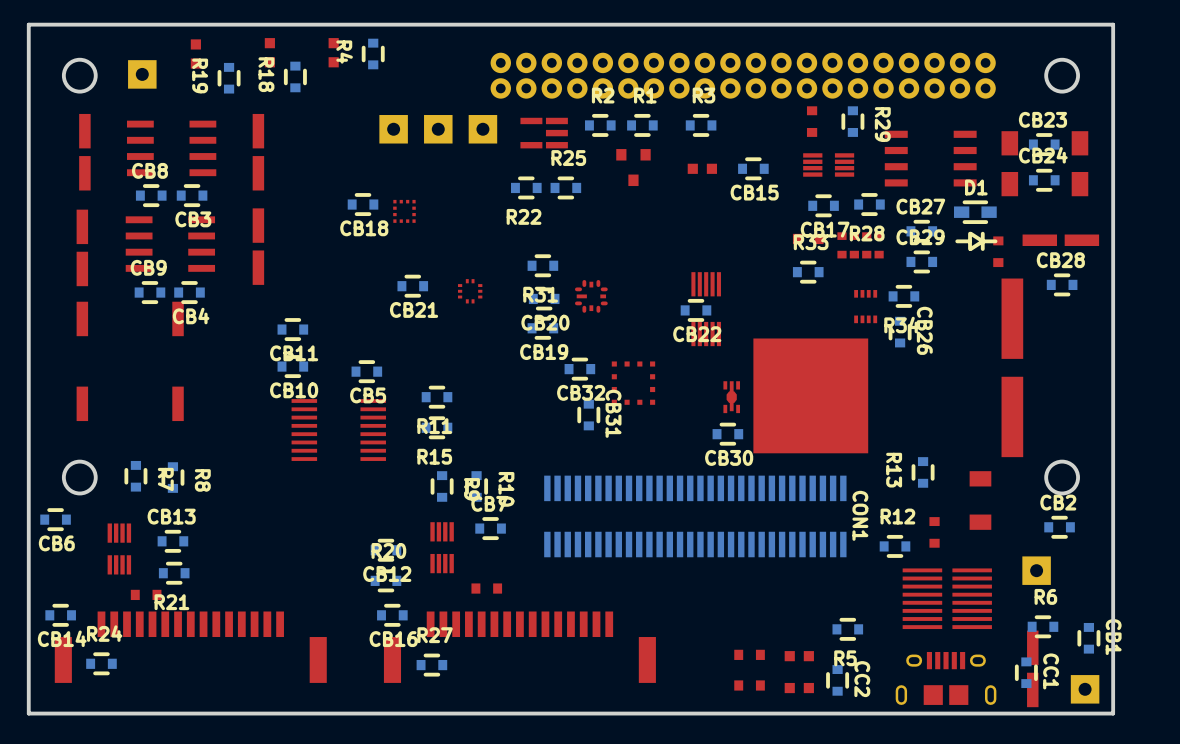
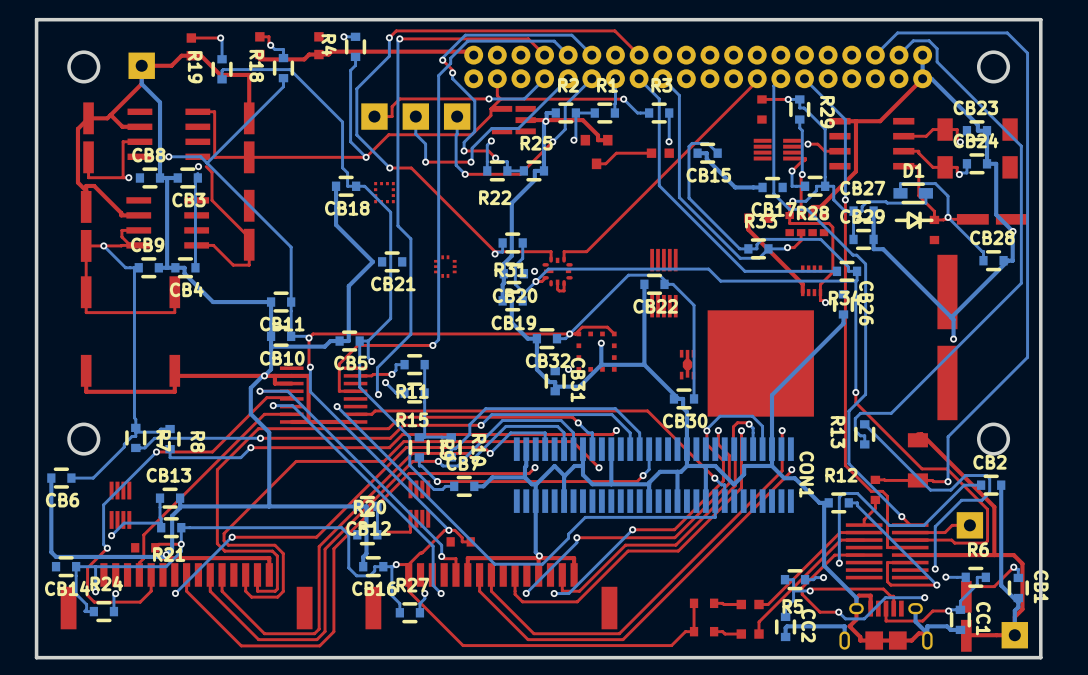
top track: none -> (259, 36) (269, 36) (270, 45)
via: none -> (343, 36)
top track: none -> (220, 38) (191, 38)
bottom track: none -> (220, 38) (222, 59)
via: none -> (220, 38)
top track: none -> (389, 37) (396, 30) (614, 30) (639, 55)
bottom track: none -> (389, 37) (389, 56) (356, 88) (356, 134) (389, 168)
via: none -> (389, 37)
top track: none -> (399, 38) (528, 38) (544, 55)
bottom track: none -> (399, 38) (397, 40) (397, 225) (410, 238) (410, 334) (377, 367) (378, 394)
via: none -> (399, 38)
bottom track: none -> (270, 45) (274, 49) (283, 49) (283, 58)
via: none -> (270, 45)
top track: none -> (473, 55) (470, 51) (331, 51) (328, 54) (309, 54) (304, 59) (259, 59)
bottom track: none -> (568, 55) (554, 41) (467, 41) (450, 58) (450, 63) (438, 75) (438, 339) (432, 345)
bottom track: none -> (591, 55) (571, 35) (465, 35) (442, 57) (442, 60)
bottom track: none -> (875, 55) (897, 32) (1007, 32) (1027, 53) (1027, 357) (948, 436) (948, 481)
bottom track: none -> (899, 55) (913, 40) (929, 40) (937, 48) (937, 61) (1021, 146) (1021, 283) (891, 413) (860, 413) (855, 418) (855, 430) (860, 435) (864, 435) (864, 444)
bottom track: none -> (922, 55) (922, 78) (931, 78) (977, 125) (977, 130) (987, 130) (987, 163) (996, 163) (996, 214) (1012, 231) (1012, 260) (1003, 260)
bottom track: none -> (355, 56) (355, 65) (350, 70) (350, 141) (366, 157)
top track: none -> (442, 60) (452, 70) (452, 72)
via: none -> (442, 60)
bottom track: none -> (141, 65) (141, 83) (160, 102) (160, 178) (177, 178)
bottom track: none -> (452, 72) (452, 78) (474, 100) (474, 131) (464, 142) (464, 150)
via: none -> (452, 72)
bottom track: none -> (283, 78) (283, 86) (207, 163)
top track: none -> (497, 78) (497, 95) (500, 99)
bottom track: none -> (544, 78) (524, 98) (489, 98)
bottom track: none -> (568, 78) (518, 128) (491, 128) (472, 148) (471, 162)
bottom track: none -> (591, 78) (565, 105) (565, 129) (552, 141)
bottom track: none -> (615, 78) (614, 113)
bottom track: none -> (639, 78) (659, 98) (659, 185) (744, 271) (836, 271)
bottom track: none -> (662, 78) (679, 95) (679, 197) (740, 258) (759, 258) (768, 248) (787, 247)
top track: none -> (757, 78) (757, 81) (586, 251) (564, 251) (564, 259)
bottom track: none -> (780, 78) (773, 85) (773, 193) (789, 209) (807, 209) (853, 255) (856, 255) (865, 264) (865, 394) (848, 411) (848, 463) (901, 516)
bottom track: none -> (804, 78) (845, 119) (845, 199)
top track: none -> (922, 78) (880, 121) (839, 121)
bottom track: none -> (222, 79) (223, 69) (290, 69) (342, 122) (342, 167) (347, 172) (347, 186) (364, 186) (390, 212) (390, 318) (368, 341)
top track: none -> (489, 98) (399, 98) (392, 106) (392, 116) (374, 116)
via: none -> (489, 98)
top track: none -> (500, 99) (490, 108)
top track: none -> (623, 99) (500, 99)
bottom track: none -> (623, 99) (637, 113) (649, 113)
via: none -> (623, 99)
top track: none -> (788, 99) (761, 99)
bottom track: none -> (788, 99) (799, 99) (799, 108) (804, 108) (825, 129) (825, 186)
via: none -> (788, 99)
top track: none -> (490, 108) (490, 115) (471, 134) (388, 134) (366, 157) (215, 157) (214, 111) (197, 111)
bottom track: none -> (555, 113) (546, 113) (546, 120) (543, 123) (543, 170) (534, 170) (534, 180) (511, 203) (511, 255) (503, 263) (502, 284) (502, 300) (511, 300) (511, 322) (527, 338) (536, 338) (536, 369) (549, 382) (555, 382) (555, 391)
bottom track: none -> (594, 113) (575, 113) (575, 138) (573, 140)
bottom track: none -> (669, 113) (669, 141)
top track: none -> (110, 114) (122, 126) (139, 126)
bottom track: none -> (415, 116) (415, 134) (425, 144) (425, 162)
bottom track: none -> (457, 116) (456, 165) (465, 174)
top track: none -> (249, 118) (249, 74) (220, 74) (201, 55) (181, 55) (171, 65) (141, 65) (141, 83) (107, 118) (88, 118) (77, 128) (77, 182) (86, 190)
bottom track: none -> (799, 119) (799, 128) (802, 130) (802, 174)
top track: none -> (525, 120) (582, 120) (598, 135) (598, 140) (607, 140)
via: none -> (545, 121)
top track: none -> (855, 121) (855, 171) (820, 206) (812, 206) (812, 215)
top track: none -> (903, 136) (926, 136) (932, 129) (957, 129) (957, 138) (960, 142)
via: none -> (573, 140)
bottom track: none -> (491, 141) (487, 145) (487, 170)
via: none -> (491, 141)
top track: none -> (139, 141) (123, 141) (123, 177)
top track: none -> (552, 141) (520, 174) (465, 174)
via: none -> (552, 141)
via: none -> (669, 141)
via: none -> (960, 142)
top track: none -> (807, 144) (817, 144) (824, 151) (839, 151)
via: none -> (807, 144)
top track: none -> (464, 150) (488, 150) (495, 158)
via: none -> (464, 150)
top track: none -> (903, 151) (918, 151) (932, 167) (957, 167) (959, 174)
top track: none -> (651, 153) (616, 153) (605, 163) (596, 163)
bottom track: none -> (697, 153) (706, 153) (706, 158) (735, 187) (762, 187)
bottom track: none -> (717, 153) (707, 143) (692, 143) (688, 146) (688, 198) (739, 248) (756, 248) (756, 244) (762, 239) (820, 239) (848, 267) (848, 271) (857, 271) (857, 280) (720, 281) (708, 269) (548, 269) (522, 294)
bottom track: none -> (168, 156) (200, 156) (291, 247) (291, 336) (307, 336) (309, 338)
via: none -> (168, 156)
top track: none -> (88, 157) (88, 177) (128, 177)
via: none -> (366, 157)
bottom track: none -> (495, 158) (499, 161) (507, 161) (507, 170) (523, 170)
via: none -> (495, 158)
top track: none -> (792, 158) (805, 158) (792, 171)
via: none -> (425, 162)
top track: none -> (471, 162) (425, 162)
via: none -> (471, 162)
bottom track: none -> (966, 163) (966, 172) (959, 174)
top track: none -> (903, 166) (918, 166) (918, 195) (934, 211) (934, 219) (972, 219)
via: none -> (198, 166)
top track: none -> (206, 166) (212, 172) (212, 200) (249, 237) (249, 265) (233, 265) (213, 245) (196, 245)
top track: none -> (389, 168) (411, 168) (495, 251)
via: none -> (389, 168)
bottom track: none -> (792, 171) (792, 186) (805, 186)
via: none -> (792, 171)
bottom track: none -> (197, 173) (195, 175) (195, 267)
via: none -> (465, 174)
top track: none -> (802, 174) (801, 215)
via: none -> (802, 174)
via: none -> (959, 174)
via: none -> (128, 177)
bottom track: none -> (167, 178) (167, 267)
bottom track: none -> (336, 186) (336, 224) (372, 261) (348, 286) (348, 341) (330, 341) (324, 346) (271, 346)
bottom track: none -> (900, 193) (900, 183) (935, 183) (948, 196) (948, 217) (983, 251) (983, 260)
bottom track: none -> (925, 193) (925, 203) (867, 201) (862, 206) (862, 211) (844, 211) (833, 199) (833, 186) (816, 186) (816, 190) (805, 201) (792, 201)
top track: none -> (845, 199) (845, 465) (871, 491) (882, 491) (887, 496) (887, 547) (910, 547)
via: none -> (845, 199)
top track: none -> (792, 201) (789, 204) (789, 223) (829, 223) (832, 227) (832, 272) (820, 284) (820, 300) (825, 302)
via: none -> (792, 201)
top track: none -> (86, 206) (86, 185) (94, 185) (121, 213) (121, 215) (138, 215)
bottom track: none -> (857, 211) (853, 215) (853, 239)
bottom track: none -> (873, 211) (873, 249) (883, 249) (953, 319) (953, 339)
top track: none -> (748, 218) (748, 229) (802, 284) (802, 292)
via: none -> (948, 217)
top track: none -> (138, 230) (121, 230) (121, 236) (130, 245)
via: none -> (1012, 231)
top track: none -> (801, 232) (801, 240) (794, 247) (787, 247)
bottom track: none -> (502, 242) (502, 252) (495, 253)
bottom track: none -> (522, 242) (522, 258) (515, 265) (515, 284) (522, 291) (522, 300)
bottom track: none -> (103, 245) (125, 267) (138, 267)
via: none -> (103, 245)
top track: none -> (138, 245) (86, 245) (86, 312) (174, 312) (174, 292)
via: none -> (787, 247)
top track: none -> (495, 251) (551, 251) (551, 259)
via: none -> (495, 253)
bottom track: none -> (1008, 260) (951, 317)
bottom track: none -> (134, 267) (135, 436) (132, 436) (124, 444) (124, 447) (93, 478) (71, 478)
bottom track: none -> (158, 267) (184, 267) (184, 273) (213, 302) (271, 302) (271, 369) (250, 387) (250, 414) (269, 432) (269, 506)
via: none -> (534, 271)
top track: none -> (545, 277) (541, 281) (535, 281)
bottom track: none -> (855, 281) (855, 392)
via: none -> (535, 281)
top track: none -> (557, 282) (559, 290) (564, 290) (564, 283)
bottom track: none -> (644, 284) (644, 364)
bottom track: none -> (664, 284) (673, 284) (694, 305) (694, 398)
bottom track: none -> (668, 284) (659, 275) (628, 275) (565, 338) (556, 338)
via: none -> (825, 302)
bottom track: none -> (843, 314) (843, 323) (772, 395) (772, 465)
via: none -> (569, 333)
top track: none -> (578, 333) (313, 333) (309, 338) (310, 367)
top track: none -> (614, 333) (607, 327) (582, 327) (575, 333)
via: none -> (309, 338)
via: none -> (953, 339)
bottom track: none -> (368, 341) (359, 341) (359, 387) (409, 437) (409, 465) (434, 489) (454, 486)
bottom track: none -> (368, 341) (368, 357) (371, 361)
bottom track: none -> (601, 343) (601, 364)
via: none -> (601, 343)
top track: none -> (432, 345) (357, 345) (339, 364) (339, 391) (355, 391)
via: none -> (432, 345)
via: none -> (371, 361)
bottom track: none -> (404, 364) (396, 364) (396, 370) (391, 374)
bottom track: none -> (424, 364) (424, 437) (451, 437)
bottom track: none -> (601, 364) (579, 386) (555, 386)
bottom track: none -> (644, 364) (601, 364)
bottom track: none -> (644, 364) (678, 398)
bottom track: none -> (310, 367) (310, 391) (448, 530)
via: none -> (310, 367)
via: none -> (568, 369)
top track: none -> (174, 370) (174, 391) (86, 391) (86, 370)
top track: none -> (391, 374) (355, 375)
via: none -> (391, 374)
top track: none -> (174, 375) (308, 375) (308, 421)
via: none -> (264, 375)
top track: none -> (274, 375) (274, 383) (291, 383)
bottom track: none -> (385, 382) (395, 393) (404, 393)
via: none -> (385, 382)
bottom track: none -> (260, 391) (287, 391) (441, 545) (441, 556)
via: none -> (260, 391)
top track: none -> (855, 392) (855, 402) (922, 468) (947, 468) (987, 509) (987, 541) (985, 543) (954, 543) (951, 540) (910, 540)
via: none -> (855, 392)
via: none -> (378, 394)
top track: none -> (291, 398) (266, 397) (212, 451) (156, 451)
bottom track: none -> (673, 398) (683, 398) (683, 408) (686, 411) (686, 465)
bottom track: none -> (273, 405) (292, 405) (433, 546) (433, 585) (441, 593)
via: none -> (273, 405)
bottom track: none -> (337, 406) (494, 564) (542, 564) (568, 538) (568, 534) (585, 517) (715, 517) (715, 501)
via: none -> (337, 406)
top track: none -> (291, 414) (264, 414) (143, 534) (143, 558) (139, 562) (139, 574)
top track: none -> (355, 414) (371, 414) (375, 410) (647, 410) (714, 478)
top track: none -> (355, 421) (291, 421)
top track: none -> (578, 422) (572, 417) (400, 417) (388, 428) (258, 428) (217, 469) (217, 543) (224, 551) (272, 551) (277, 556) (277, 589) (275, 591) (257, 591) (257, 574)
bottom track: none -> (578, 422) (588, 432) (592, 432) (592, 449)
via: none -> (578, 422)
top track: none -> (749, 424) (737, 422) (733, 426) (735, 485) (675, 545) (625, 545) (579, 591) (562, 591) (562, 574)
bottom track: none -> (749, 424) (753, 428) (753, 449)
via: none -> (749, 424)
bottom track: none -> (864, 424) (930, 490) (950, 490) (965, 475) (986, 475) (989, 478) (989, 492) (982, 500) (961, 500) (935, 526) (935, 569)
top track: none -> (481, 425) (403, 425) (390, 438) (260, 438)
bottom track: none -> (481, 425) (491, 414) (611, 414) (630, 432) (630, 449)
via: none -> (481, 425)
bottom track: none -> (170, 429) (160, 429) (157, 432) (135, 432)
top track: none -> (616, 430) (612, 434) (402, 434) (389, 447) (250, 447)
via: none -> (616, 430)
top track: none -> (706, 430) (706, 444) (723, 460) (723, 480) (674, 529) (632, 529)
bottom track: none -> (706, 430) (720, 416) (752, 416) (762, 426) (762, 449)
via: none -> (706, 430)
top track: none -> (718, 430) (718, 444) (729, 455) (729, 483) (674, 537) (576, 537)
via: none -> (718, 430)
top track: none -> (741, 430) (741, 487) (678, 551) (628, 551) (577, 601) (522, 601) (515, 594) (515, 574)
via: none -> (741, 430)
top track: none -> (782, 430) (782, 470) (619, 633) (533, 633) (491, 591) (491, 574)
via: none -> (782, 430)
top track: none -> (917, 434) (921, 434) (994, 506) (994, 555)
bottom track: none -> (260, 438) (154, 438) (144, 447) (135, 447)
via: none -> (260, 438)
bottom track: none -> (250, 447) (240, 457) (170, 457) (170, 449)
via: none -> (250, 447)
bottom track: none -> (526, 449) (524, 477)
bottom track: none -> (545, 449) (545, 432) (510, 432) (490, 453)
bottom track: none -> (564, 449) (564, 432) (557, 426) (505, 426) (474, 457) (474, 460)
bottom track: none -> (573, 449) (573, 432) (561, 420) (502, 420) (458, 465) (442, 465) (438, 461)
bottom track: none -> (582, 449) (582, 474) (592, 484) (649, 484)
bottom track: none -> (611, 449) (611, 484)
bottom track: none -> (639, 449) (639, 432) (615, 408) (485, 408) (469, 424) (469, 434) (455, 448) (451, 448) (451, 457)
bottom track: none -> (649, 449) (649, 469) (643, 475)
bottom track: none -> (156, 451) (103, 504) (103, 544) (107, 548)
via: none -> (156, 451)
top track: none -> (490, 453) (484, 447) (406, 447) (316, 537) (232, 537)
via: none -> (490, 453)
bottom track: none -> (419, 457) (419, 465) (421, 465) (437, 481)
top track: none -> (474, 460) (467, 453) (412, 453) (319, 546) (319, 629) (314, 633) (264, 633) (222, 591) (222, 574)
top track: none -> (438, 461) (412, 461) (325, 549) (325, 631) (316, 639) (258, 639) (210, 591) (210, 574)
via: none -> (438, 461)
bottom track: none -> (582, 465) (574, 465) (564, 476) (564, 501)
bottom track: none -> (686, 465) (681, 471) (660, 471) (649, 482) (649, 501)
bottom track: none -> (705, 465) (705, 501)
bottom track: none -> (772, 465) (744, 465) (744, 474) (734, 484) (715, 465) (686, 465)
bottom track: none -> (772, 465) (784, 478) (794, 478) (819, 502) (828, 502)
top track: none -> (535, 467) (529, 473) (409, 473) (333, 548) (333, 631) (319, 645) (241, 645) (186, 591) (186, 574)
via: none -> (535, 467)
top track: none -> (599, 467) (572, 441) (403, 441) (384, 461) (296, 461) (224, 533) (224, 540) (228, 545) (274, 545) (283, 553) (283, 591) (277, 597) (251, 597) (245, 591) (245, 574)
via: none -> (599, 467)
top track: none -> (791, 469) (622, 639) (528, 639) (479, 591) (479, 574)
via: none -> (791, 469)
bottom track: none -> (677, 471) (677, 501)
top track: none -> (643, 475) (637, 481) (437, 481)
via: none -> (643, 475)
bottom track: none -> (564, 475) (554, 465) (536, 484) (531, 484) (524, 477)
bottom track: none -> (524, 477) (492, 477) (483, 486) (474, 486)
bottom track: none -> (51, 478) (51, 552) (56, 556) (164, 556) (172, 548) (172, 515) (180, 507) (180, 498)
bottom track: none -> (714, 478) (721, 484) (724, 484) (724, 501)
via: none -> (714, 478)
top track: none -> (875, 479) (948, 481)
via: none -> (437, 481)
via: none -> (948, 481)
bottom track: none -> (535, 484) (535, 552) (539, 555)
bottom track: none -> (981, 485) (964, 485) (923, 525) (889, 525) (857, 493) (843, 493) (839, 497) (839, 563)
bottom track: none -> (1001, 485) (1001, 585) (1018, 602)
bottom track: none -> (160, 498) (161, 527)
top track: none -> (875, 499) (875, 508) (864, 519) (864, 525)
bottom track: none -> (824, 502) (824, 565) (856, 598) (856, 608)
bottom track: none -> (848, 502) (857, 502) (857, 505) (936, 585)
bottom track: none -> (180, 506) (366, 506) (366, 553) (363, 556) (363, 566)
bottom track: none -> (377, 506) (377, 534)
top track: none -> (901, 516) (910, 525)
via: none -> (901, 516)
top track: none -> (410, 518) (410, 532) (388, 532)
bottom track: none -> (161, 523) (124, 523) (111, 535)
top track: none -> (969, 525) (952, 525) (945, 532) (910, 532)
bottom track: none -> (632, 529) (568, 593) (554, 593)
via: none -> (632, 529)
via: none -> (448, 530)
top track: none -> (864, 532) (840, 532) (768, 604) (759, 604)
via: none -> (111, 535)
bottom track: none -> (232, 537) (175, 593)
via: none -> (232, 537)
bottom track: none -> (576, 537) (576, 542) (526, 593)
via: none -> (576, 537)
top track: none -> (864, 540) (840, 540) (759, 622) (759, 634)
top track: none -> (470, 541) (462, 541) (462, 537) (454, 530) (444, 530) (407, 565)
top track: none -> (181, 544) (158, 544) (155, 547)
via: none -> (181, 544)
top track: none -> (107, 548) (87, 567) (87, 595) (94, 602) (140, 602) (151, 591) (151, 574)
via: none -> (107, 548)
top track: none -> (166, 554) (162, 558) (269, 558) (269, 574)
via: none -> (166, 554)
top track: none -> (864, 555) (834, 555) (802, 587) (802, 594) (820, 612) (838, 612)
top track: none -> (910, 555) (1013, 555) (1022, 563) (1022, 609) (1014, 616) (1014, 635) (966, 635)
via: none -> (539, 555)
top track: none -> (441, 556) (443, 558) (455, 558) (455, 574)
via: none -> (441, 556)
top track: none -> (538, 558) (467, 558) (467, 574)
top track: none -> (910, 562) (887, 562) (887, 581) (890, 585) (936, 585)
via: none -> (839, 563)
top track: none -> (396, 564) (406, 564) (408, 566) (408, 591) (463, 645) (671, 645) (685, 631) (694, 631) (694, 603)
bottom track: none -> (396, 564) (394, 566) (374, 566) (374, 570) (369, 575) (356, 575) (348, 567) (348, 534) (341, 527) (181, 527) (181, 551) (166, 566) (76, 566) (76, 594) (86, 604) (85, 611) (93, 611)
via: none -> (396, 564)
bottom track: none -> (95, 566) (95, 591)
bottom track: none -> (391, 566) (391, 595) (399, 603) (399, 612)
top track: none -> (1013, 567) (994, 586) (966, 586)
bottom track: none -> (1013, 567) (1018, 569) (1018, 577)
via: none -> (1013, 567)
via: none -> (935, 569)
top track: none -> (574, 574) (574, 558) (541, 558) (539, 555) (538, 574)
bottom track: none -> (945, 577) (965, 577)
via: none -> (945, 577)
bottom track: none -> (985, 577) (977, 577) (977, 584) (960, 601) (960, 609) (948, 610)
bottom track: none -> (823, 577) (805, 579)
via: none -> (823, 577)
bottom track: none -> (785, 579) (793, 579) (793, 600) (785, 608) (785, 616)
via: none -> (936, 585)
top track: none -> (810, 590) (812, 589) (883, 589) (890, 596) (893, 596) (893, 608)
bottom track: none -> (810, 590) (793, 590)
via: none -> (810, 590)
via: none -> (95, 591)
bottom track: none -> (115, 593) (113, 595) (113, 611)
via: none -> (115, 593)
via: none -> (175, 593)
bottom track: none -> (424, 593) (424, 598) (419, 603) (419, 612)
via: none -> (424, 593)
via: none -> (441, 593)
via: none -> (526, 593)
via: none -> (554, 593)
bottom track: none -> (924, 597) (885, 597) (864, 618) (845, 618) (838, 612)
via: none -> (924, 597)
bottom track: none -> (1018, 598) (1018, 607) (1014, 610) (1014, 635)
top track: none -> (714, 603) (741, 604)
top track: none -> (870, 608) (870, 595) (858, 595) (856, 598) (856, 619) (849, 626) (860, 637) (860, 640) (911, 640) (918, 633) (927, 633)
top track: none -> (886, 608) (886, 621) (922, 621) (932, 610) (948, 610)
bottom track: none -> (915, 608) (915, 621) (927, 633)
via: none -> (948, 610)
via: none -> (838, 612)
bottom track: none -> (960, 629) (950, 629) (947, 626) (927, 626) (927, 640)
top track: none -> (714, 631) (741, 634)
bottom track: none -> (785, 636) (787, 626) (844, 626) (844, 640)

